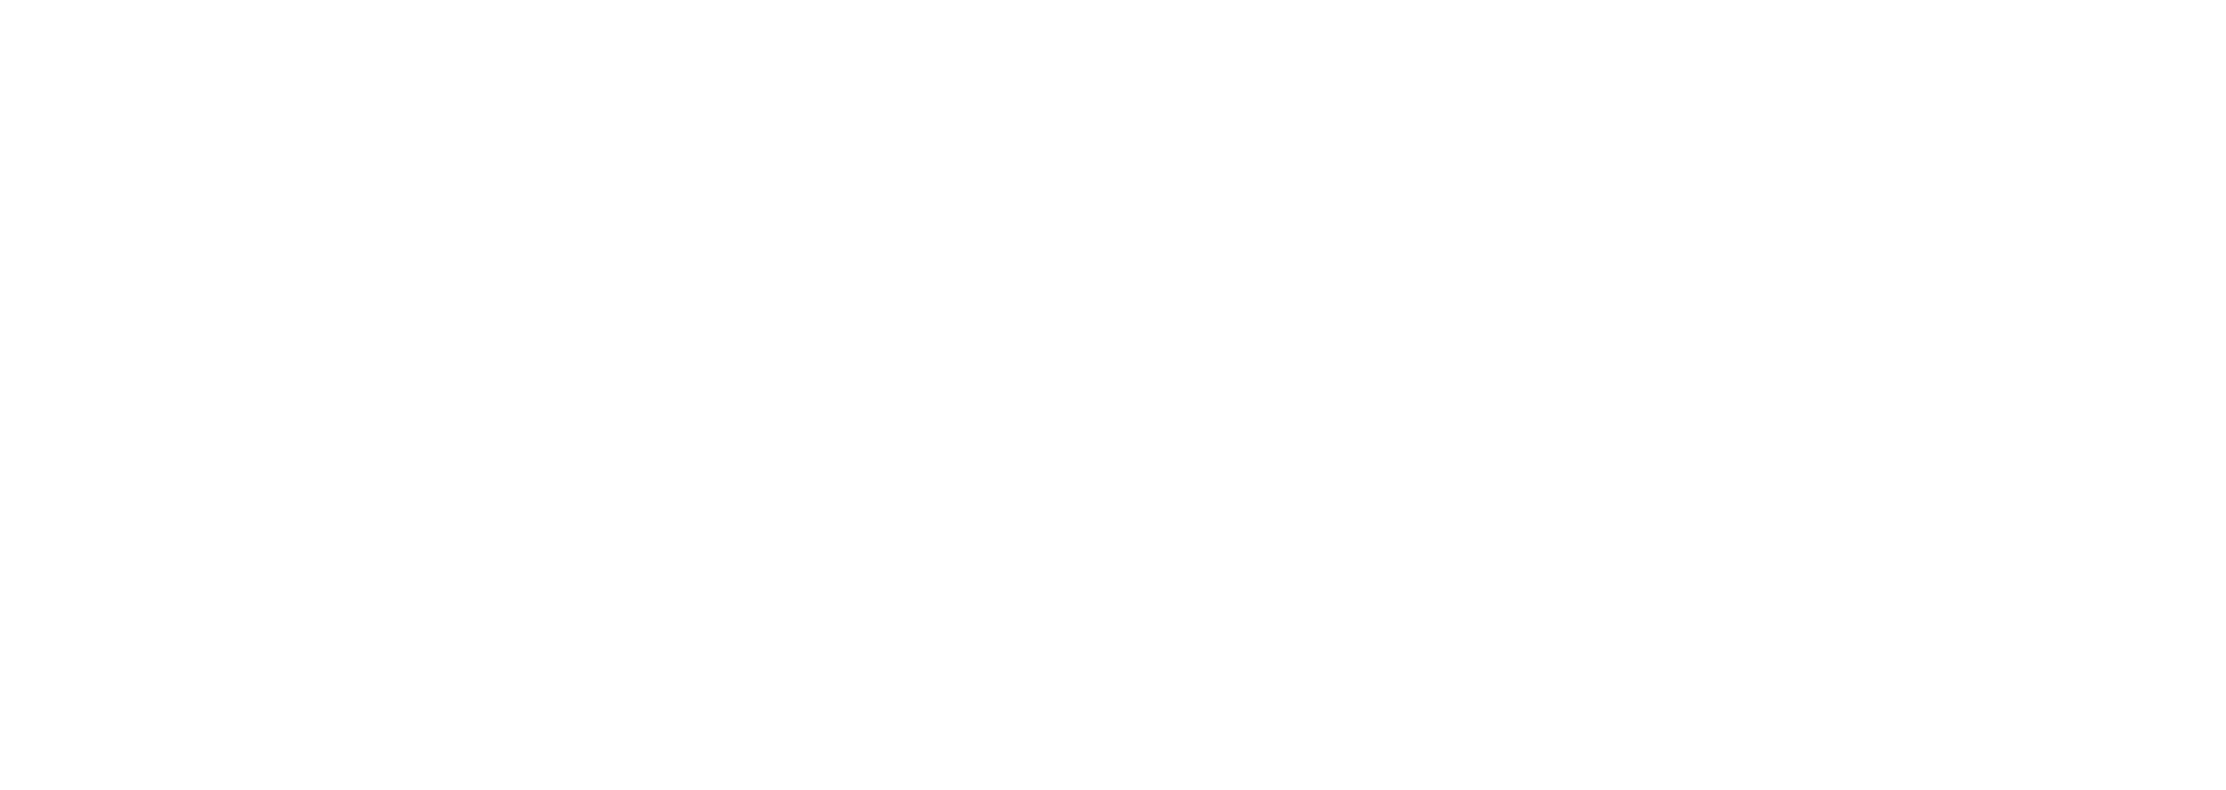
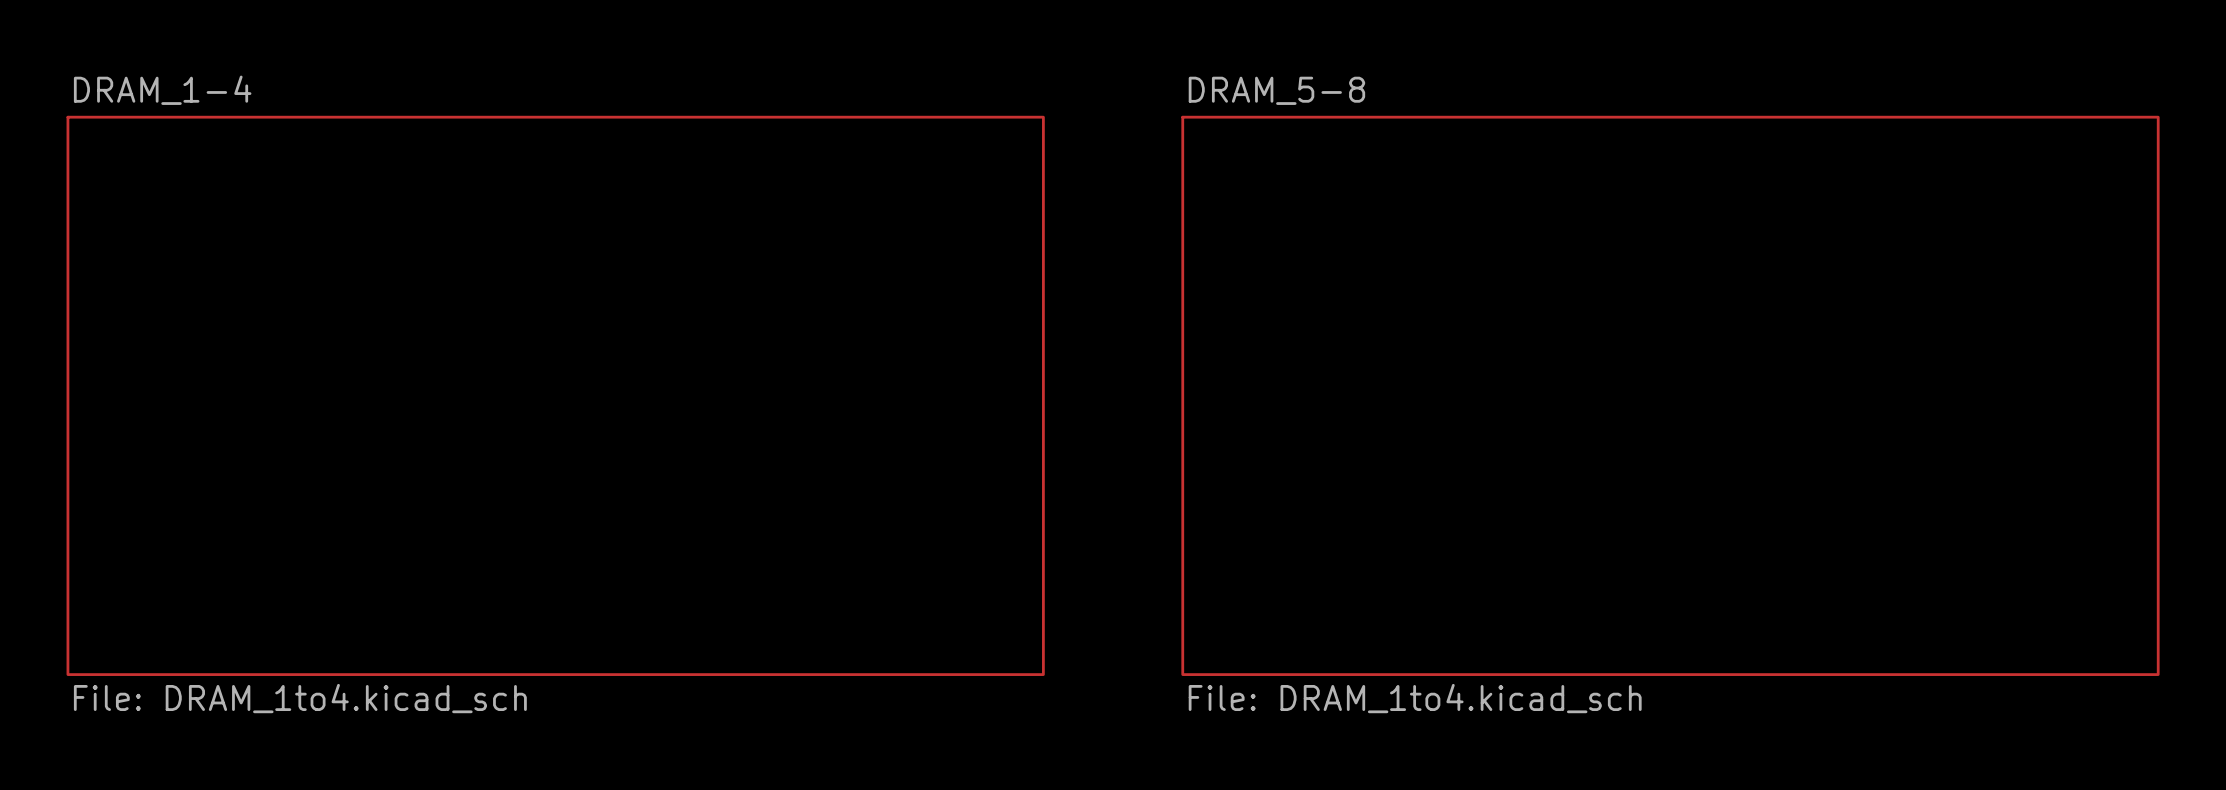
sheet DRAM_1-4: none -> File: DRAM_1to4.kicad_sch (555, 395)
sheet DRAM_5-8: none -> File: DRAM_1to4.kicad_sch (1670, 395)

